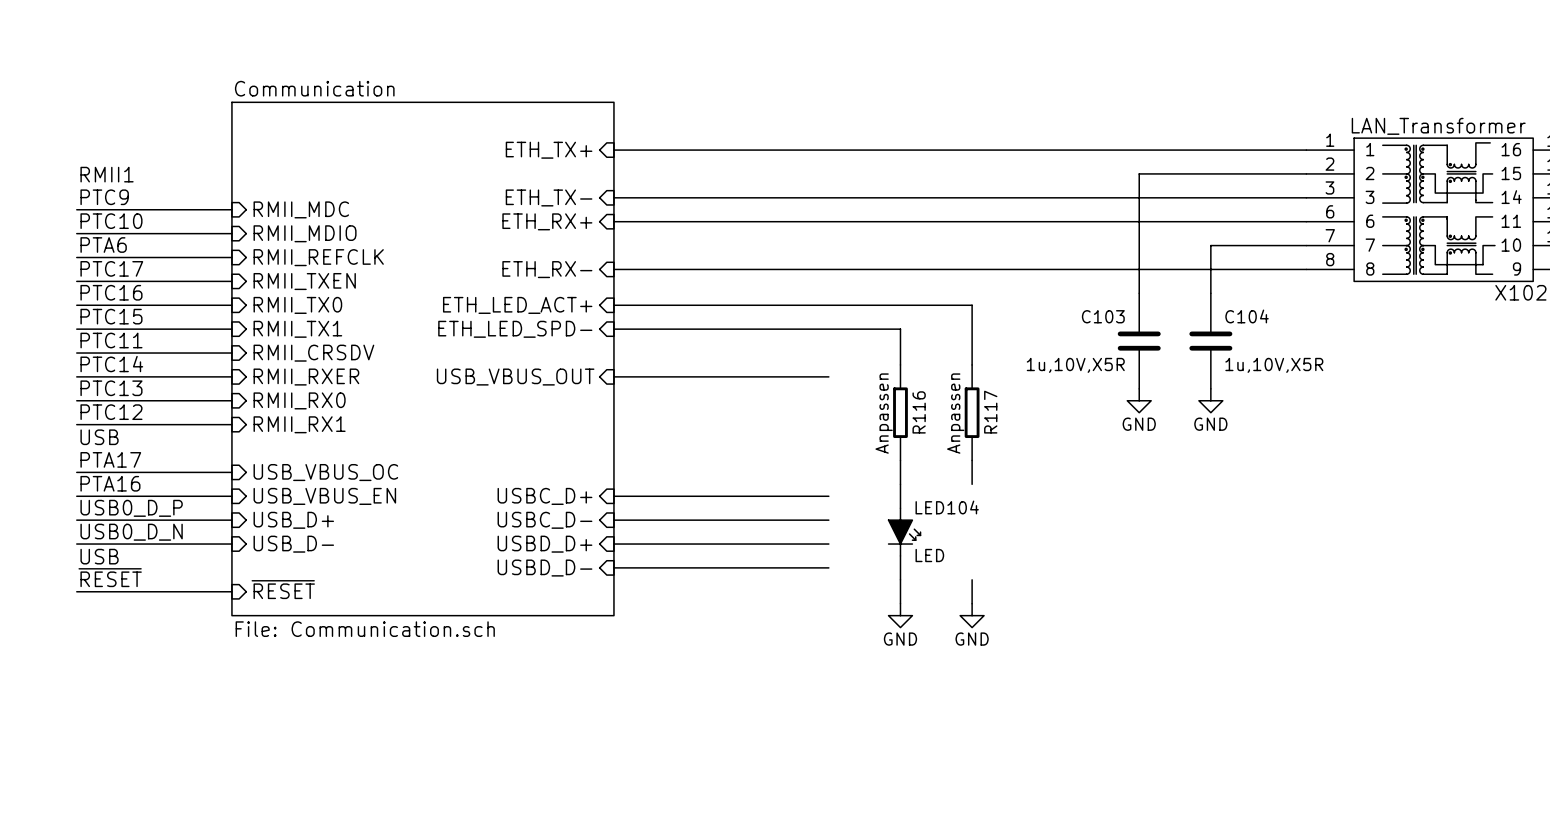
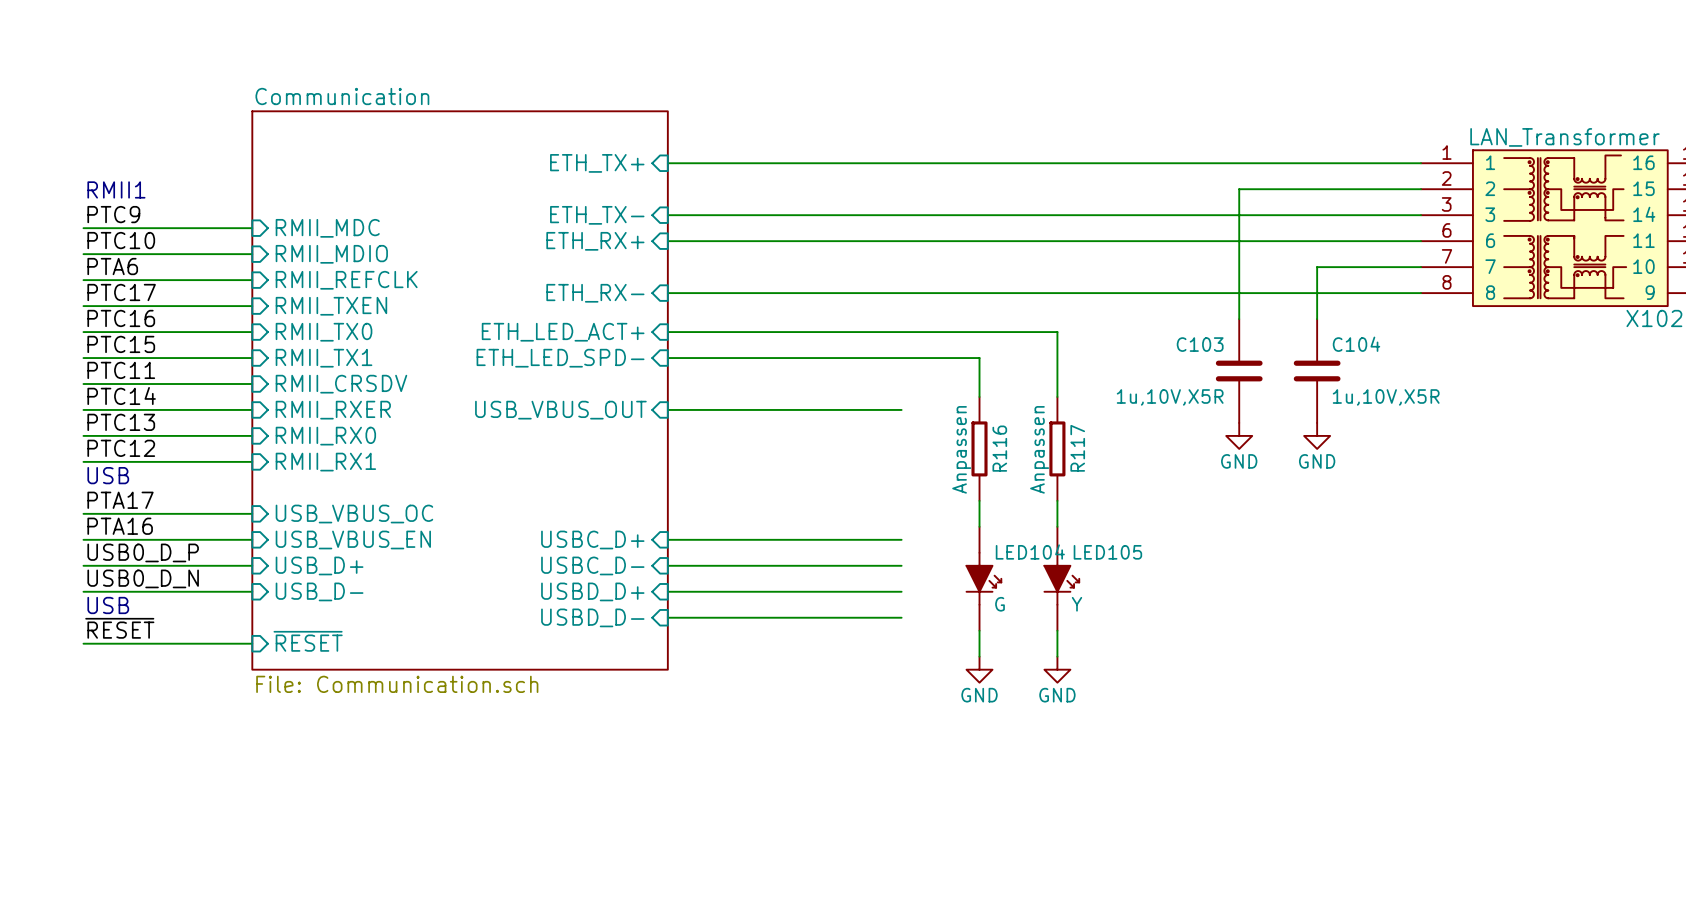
LED105: none -> Y (1061, 578)
LED104 value: LED (929, 555) -> G (1000, 604)

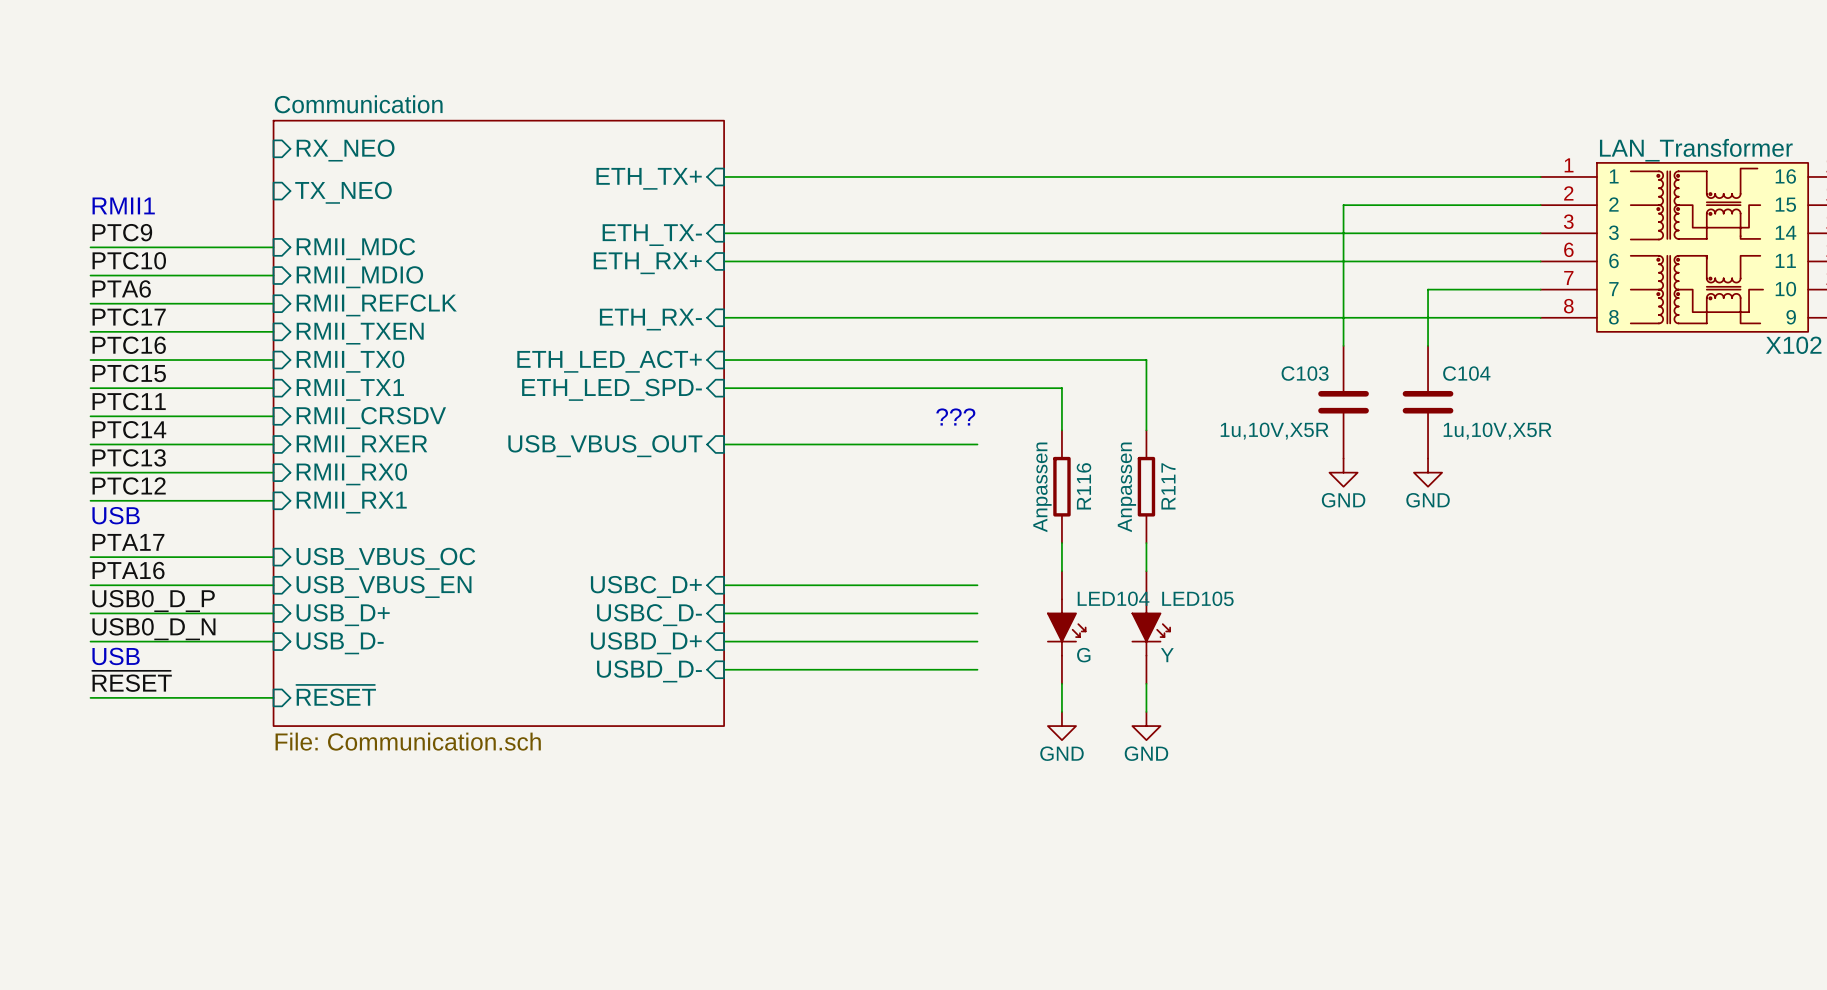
sheet pin: none -> RX_NEO (345, 150)
sheet pin: none -> TX_NEO (343, 192)
text: none -> ??? (955, 416)

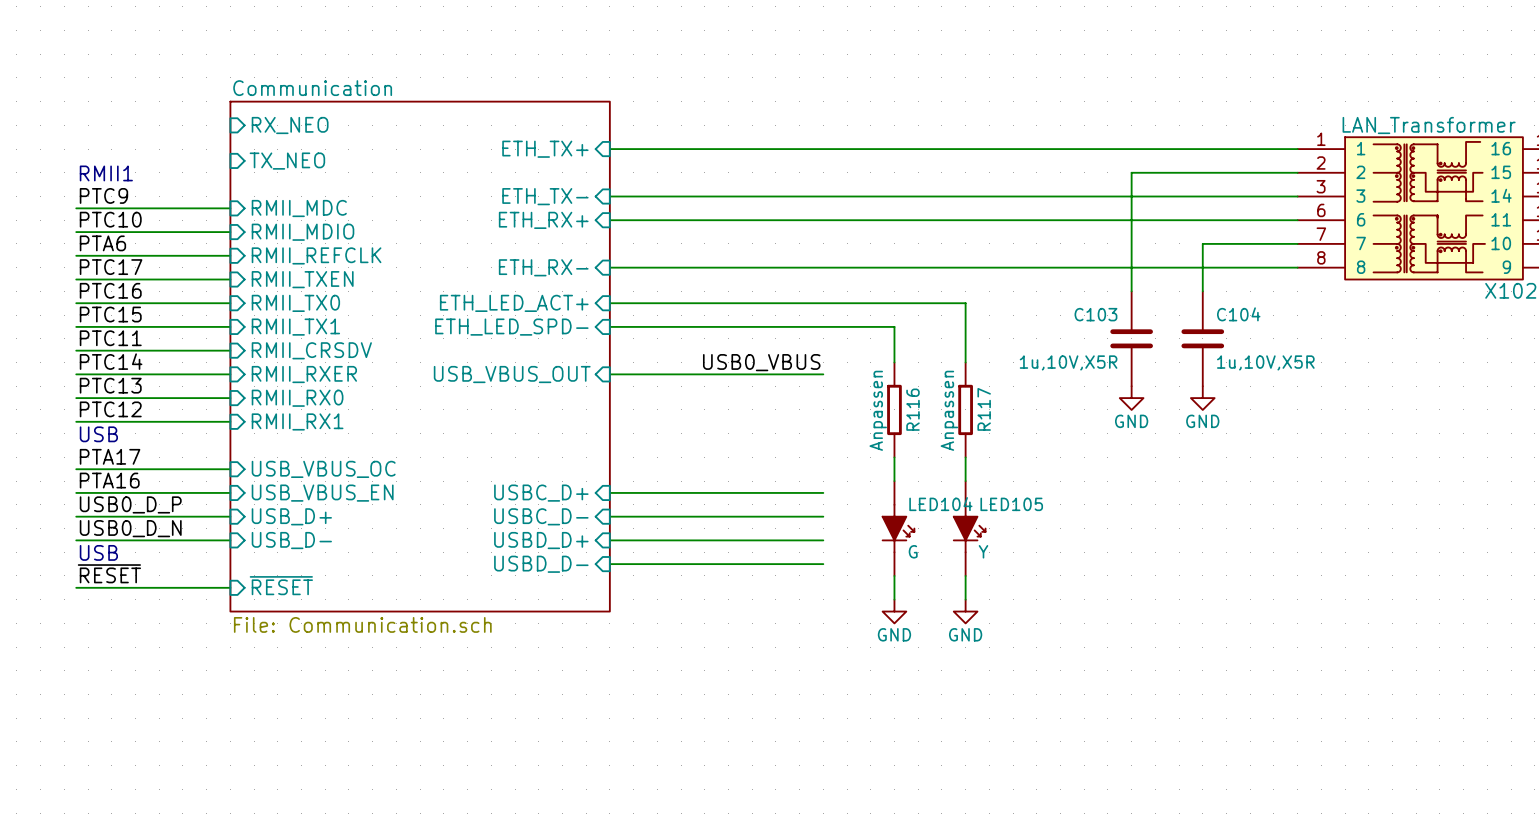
text: ??? (955, 416) -> none
label: none -> USB0_VBUS (761, 362)

